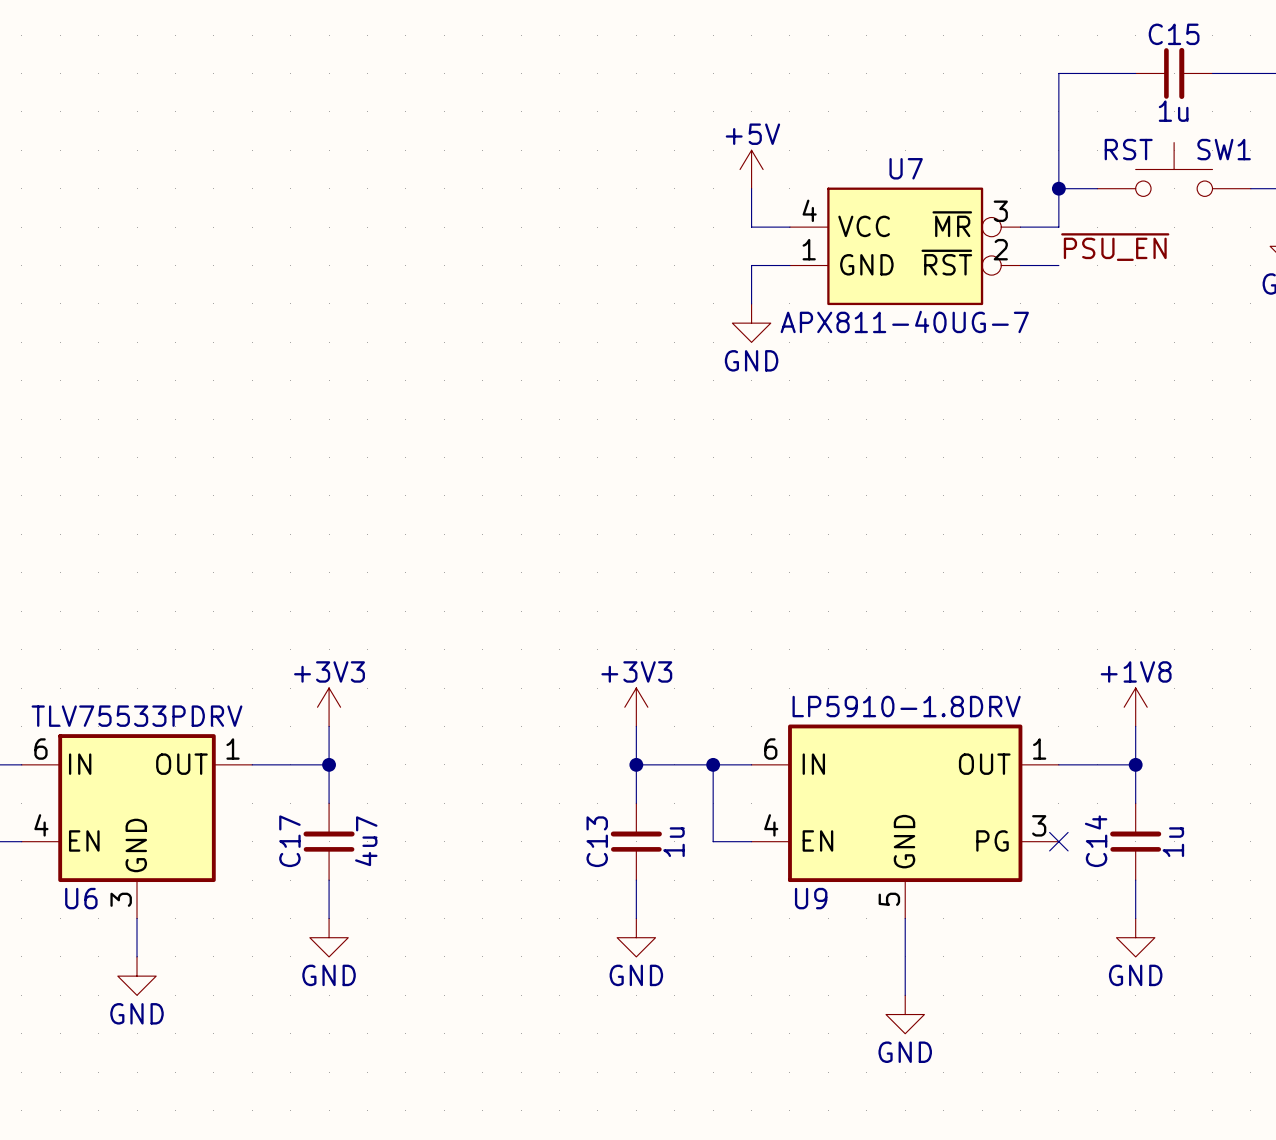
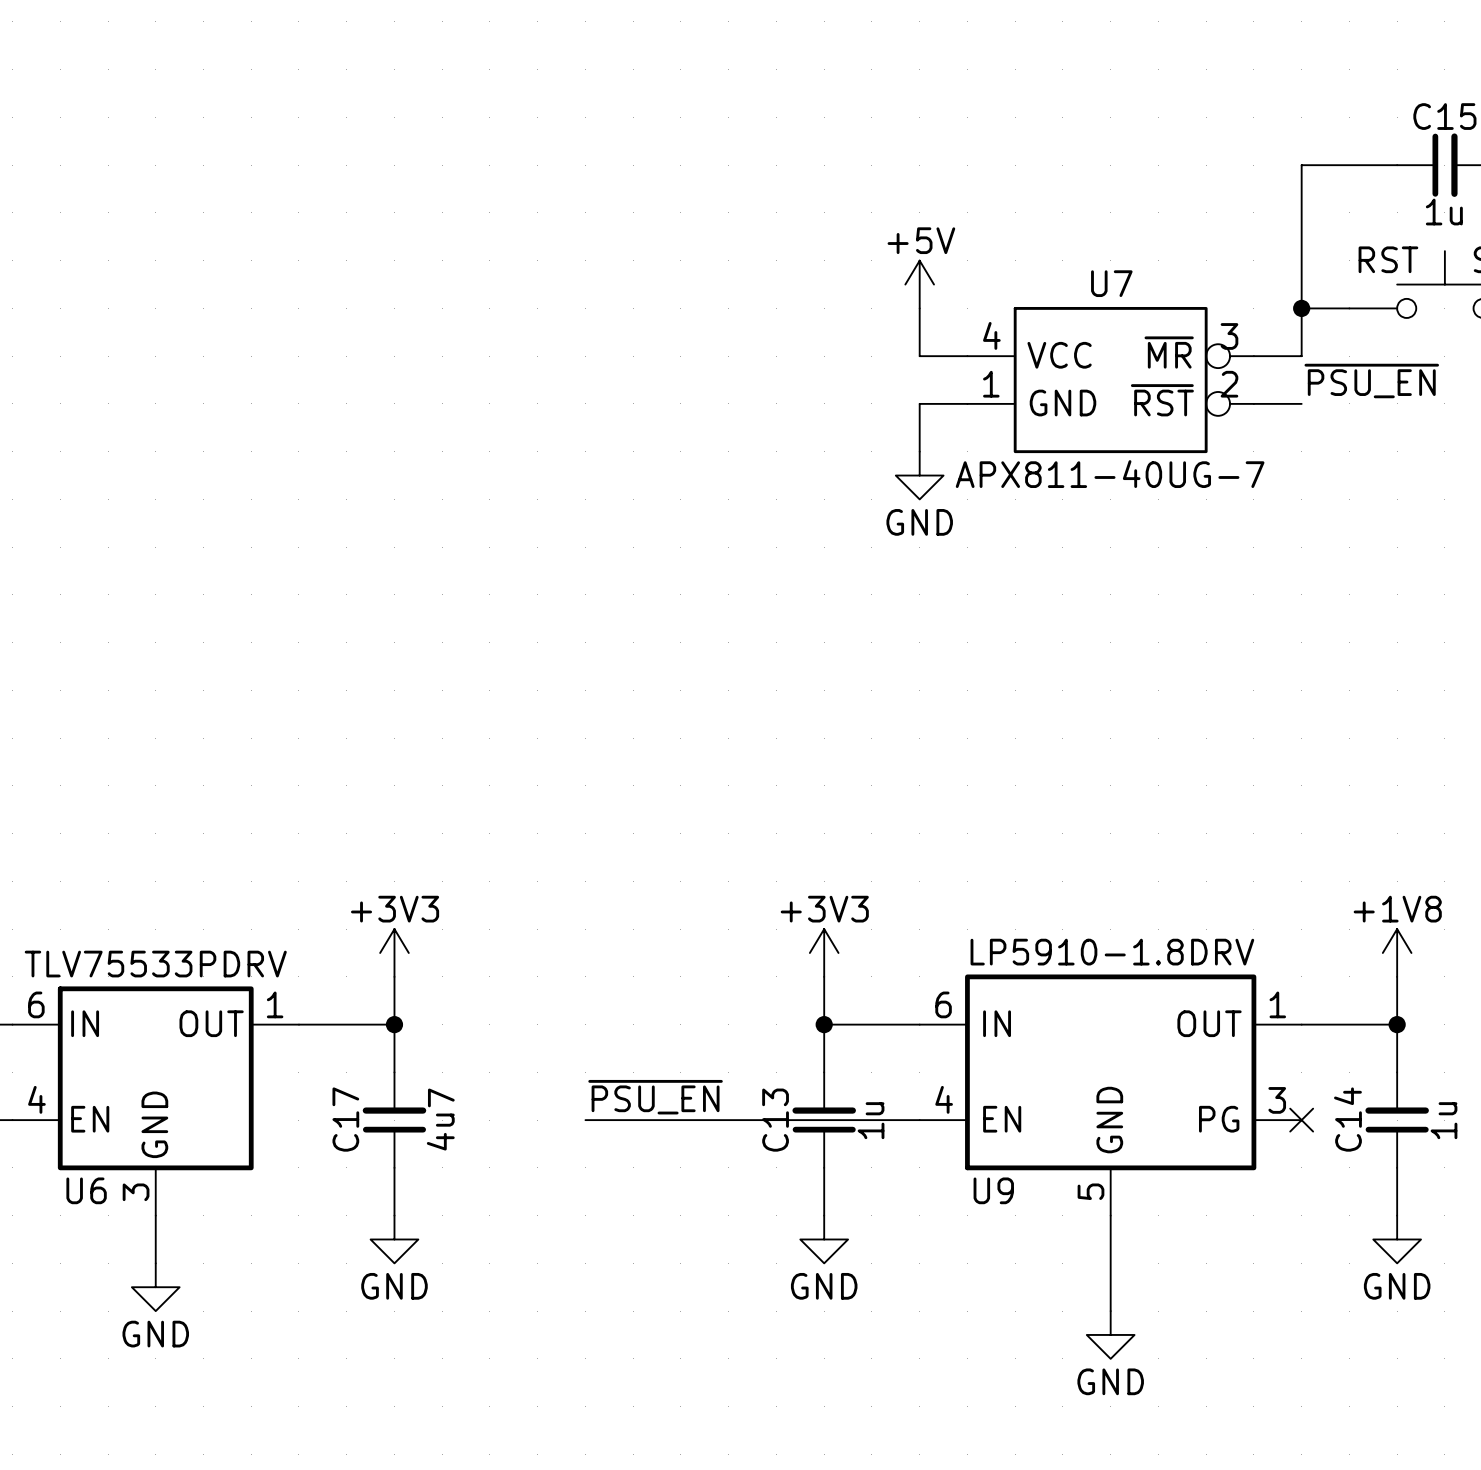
power symbol position: +3V3 (636, 707) -> +3V3 (824, 953)
wire: (636, 726) (636, 803) -> (824, 976) (824, 1072)
wire: (636, 764) (674, 764) -> none
junction: (636, 764) -> none
junction: none -> (824, 1024)
wire: (713, 764) (713, 841) -> (585, 1120) (871, 1120)
junction: (713, 764) -> none
label: none -> ~{PSU_EN} (655, 1097)
C13 position: (636, 841) -> (824, 1120)
wire: (636, 880) (636, 918) -> (824, 1167) (824, 1215)
power symbol position: GND (636, 937) -> GND (824, 1239)

